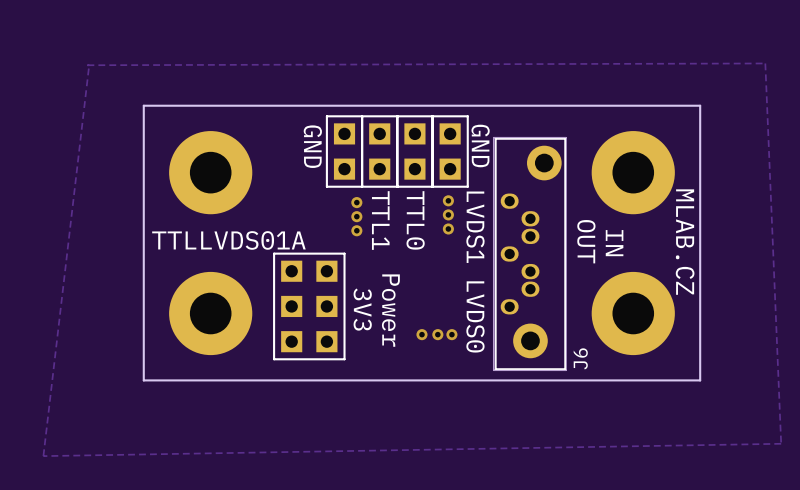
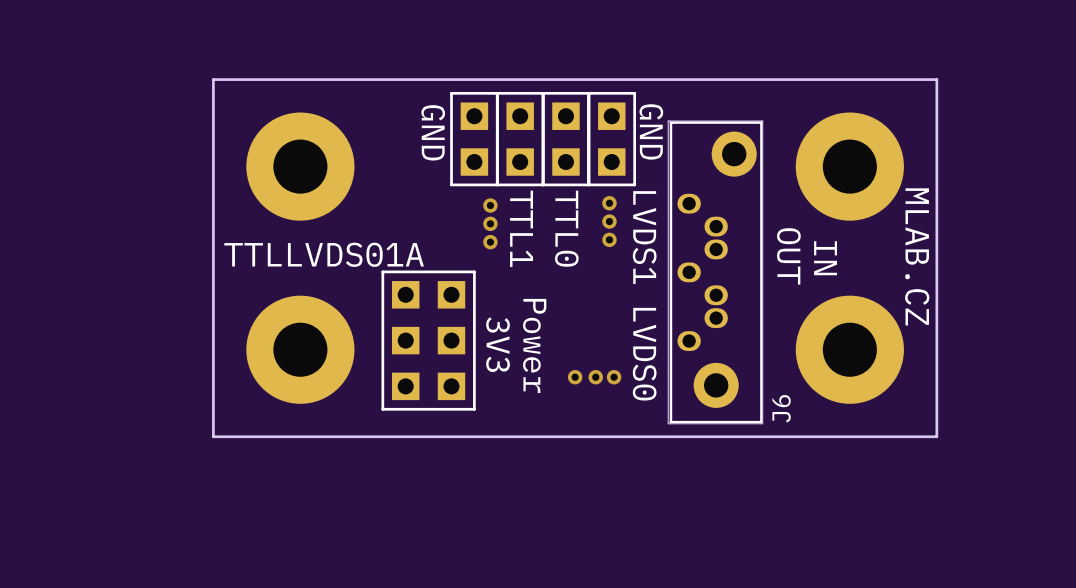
zone outline: (765, 63) (87, 65) (89, 65) (43, 456) (781, 443) (765, 63) -> none

